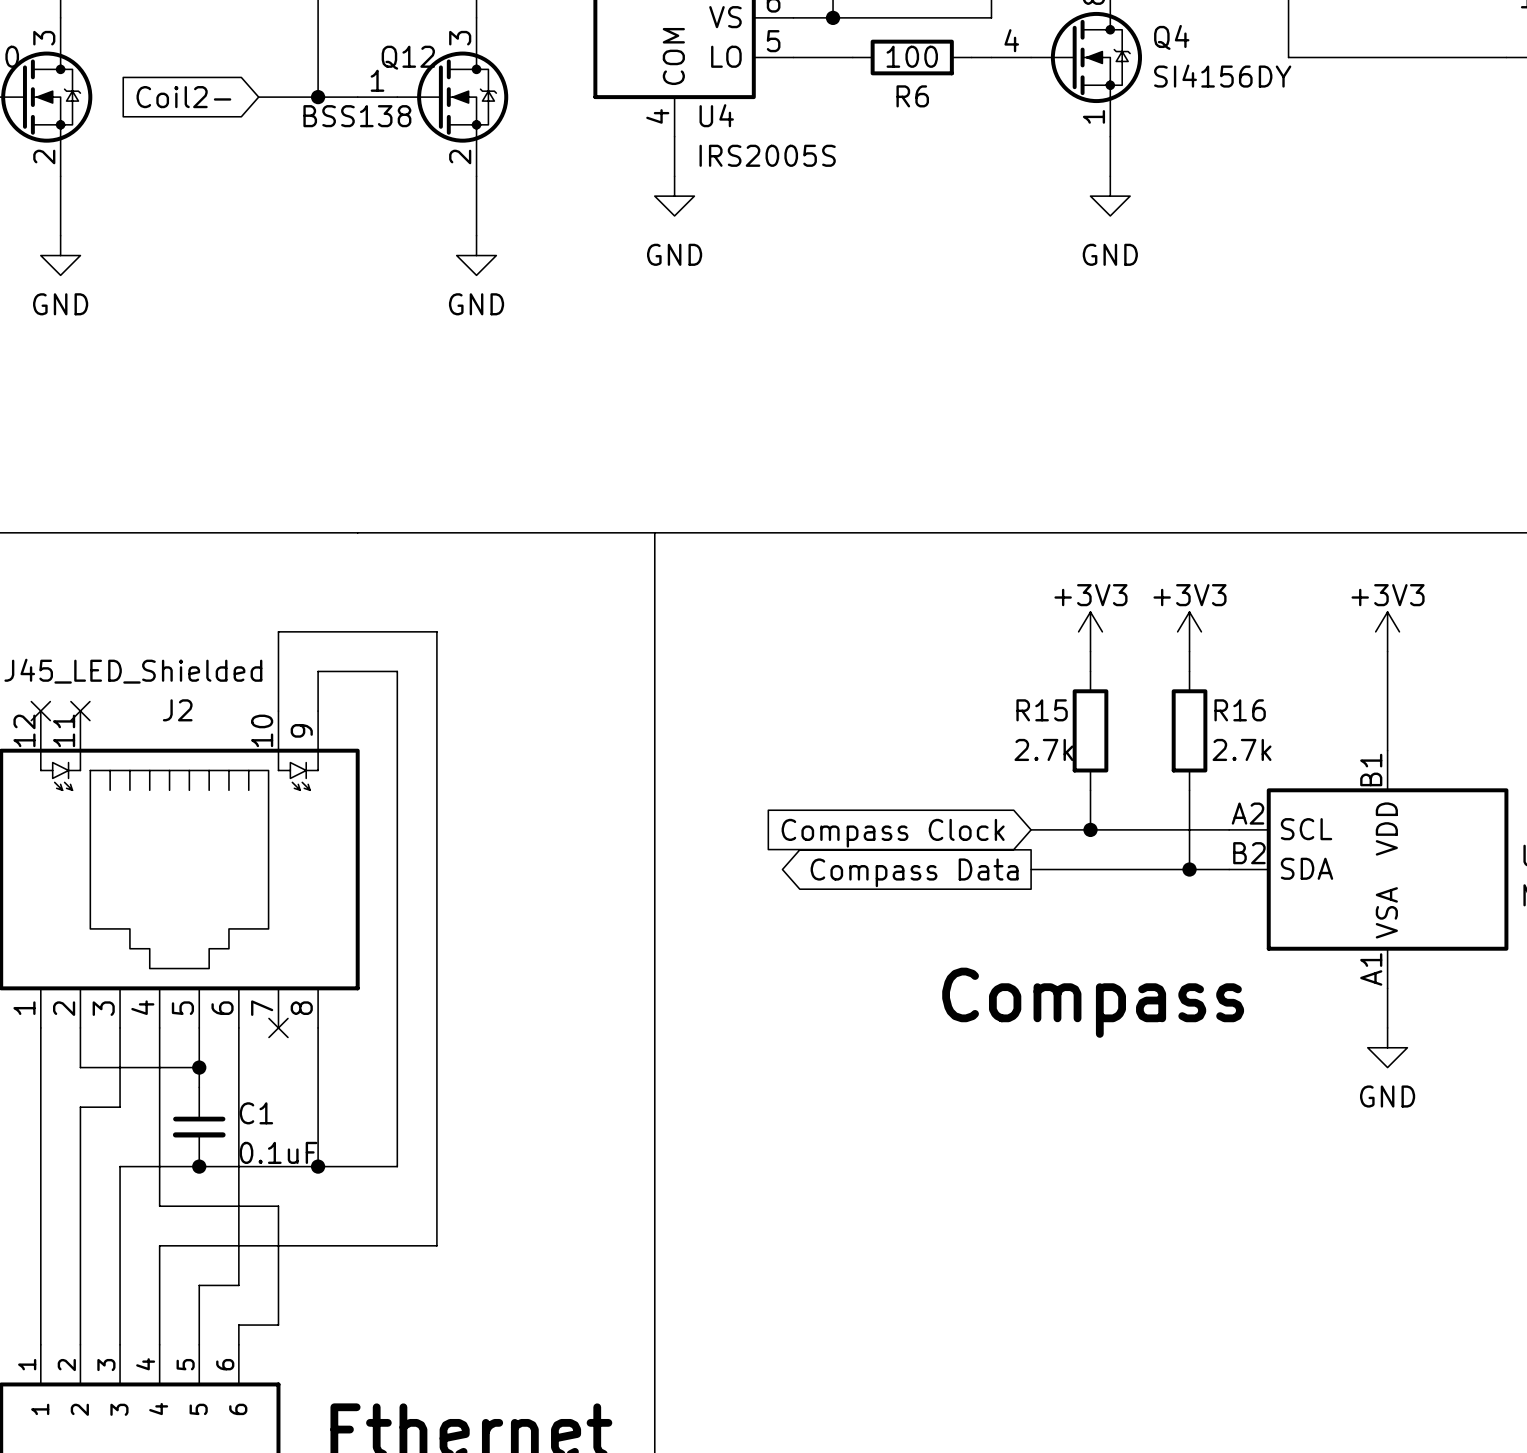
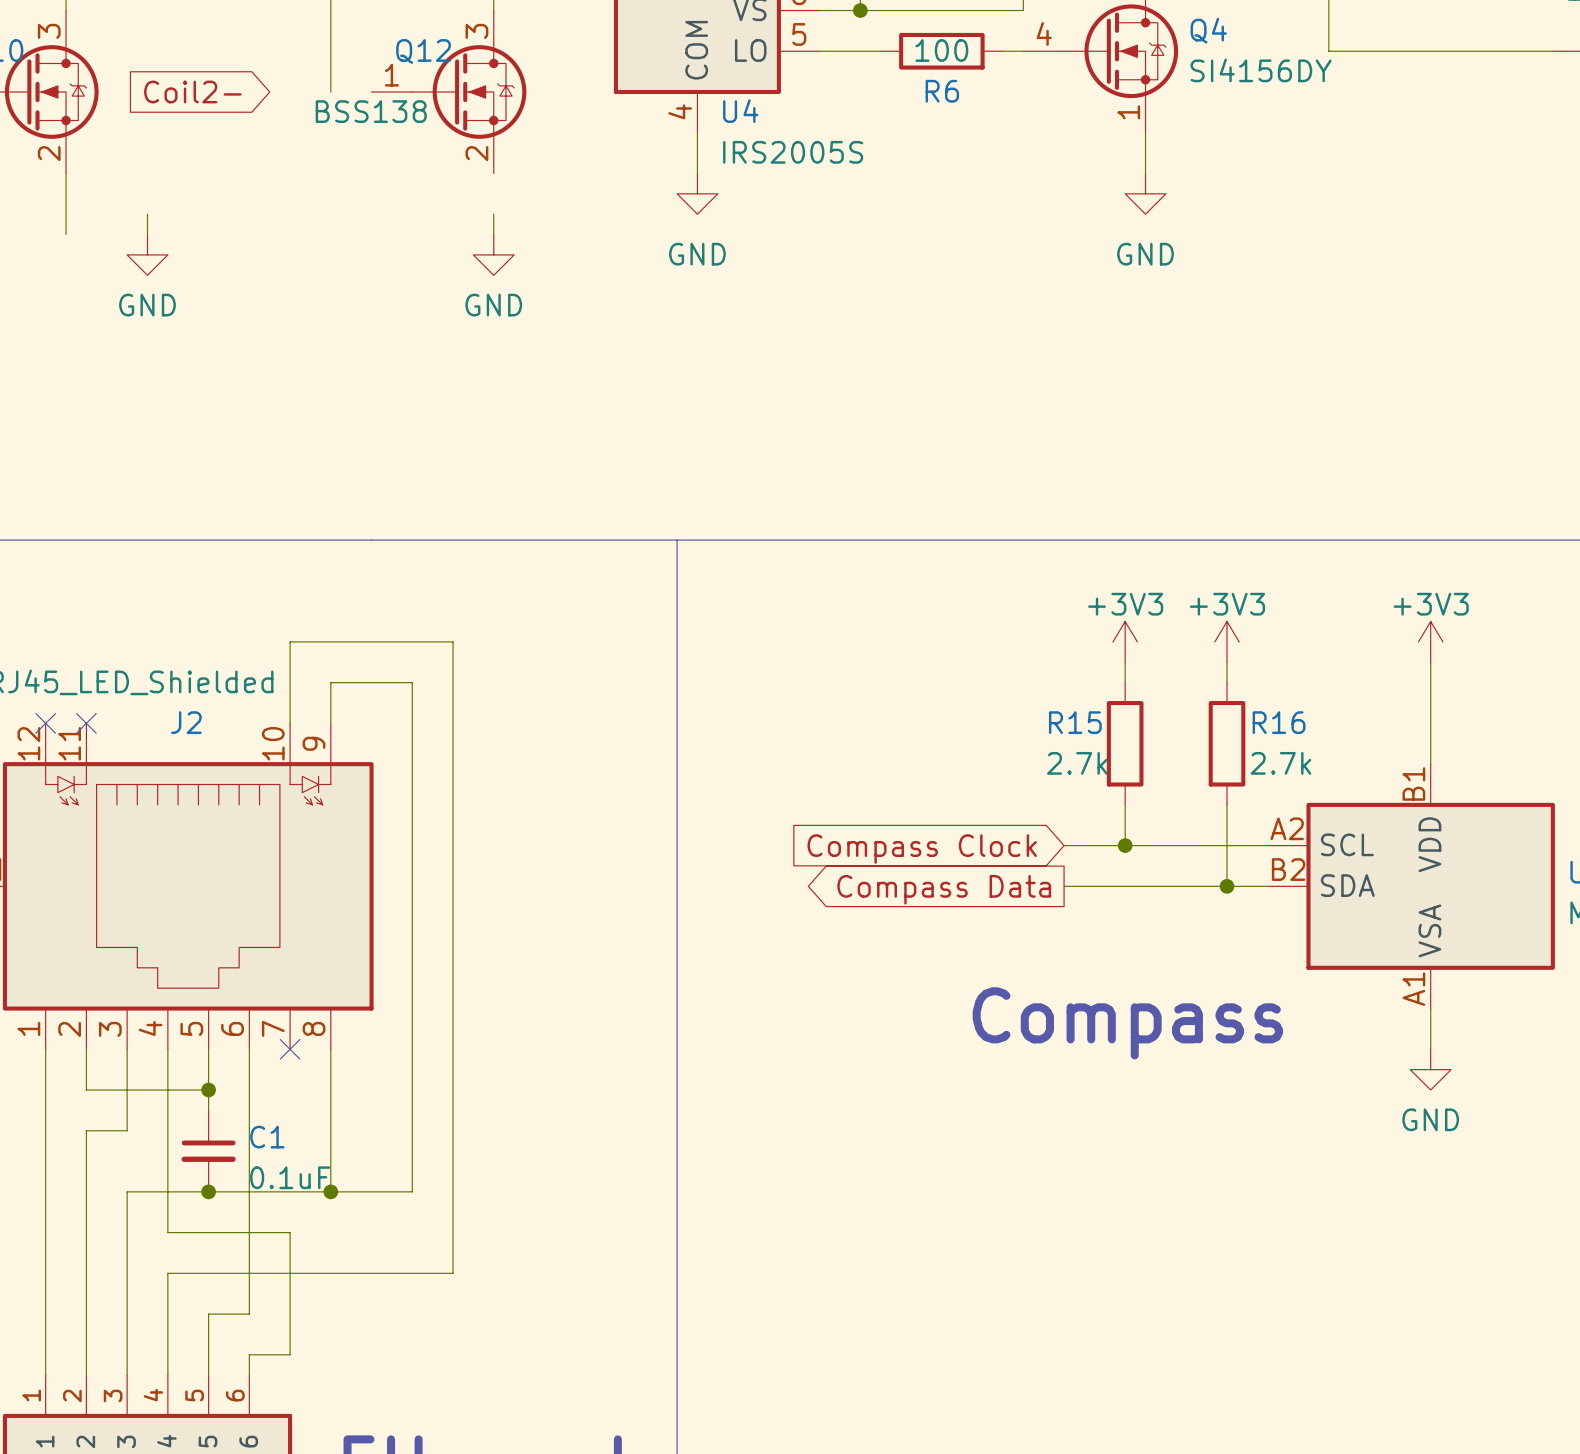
wire: (258, 97) (357, 97) -> none
junction: (318, 97) -> none
wire: (476, 176) (476, 215) -> none
wire: none -> (147, 214) (147, 234)
power symbol position: GND (60, 255) -> GND (147, 254)

